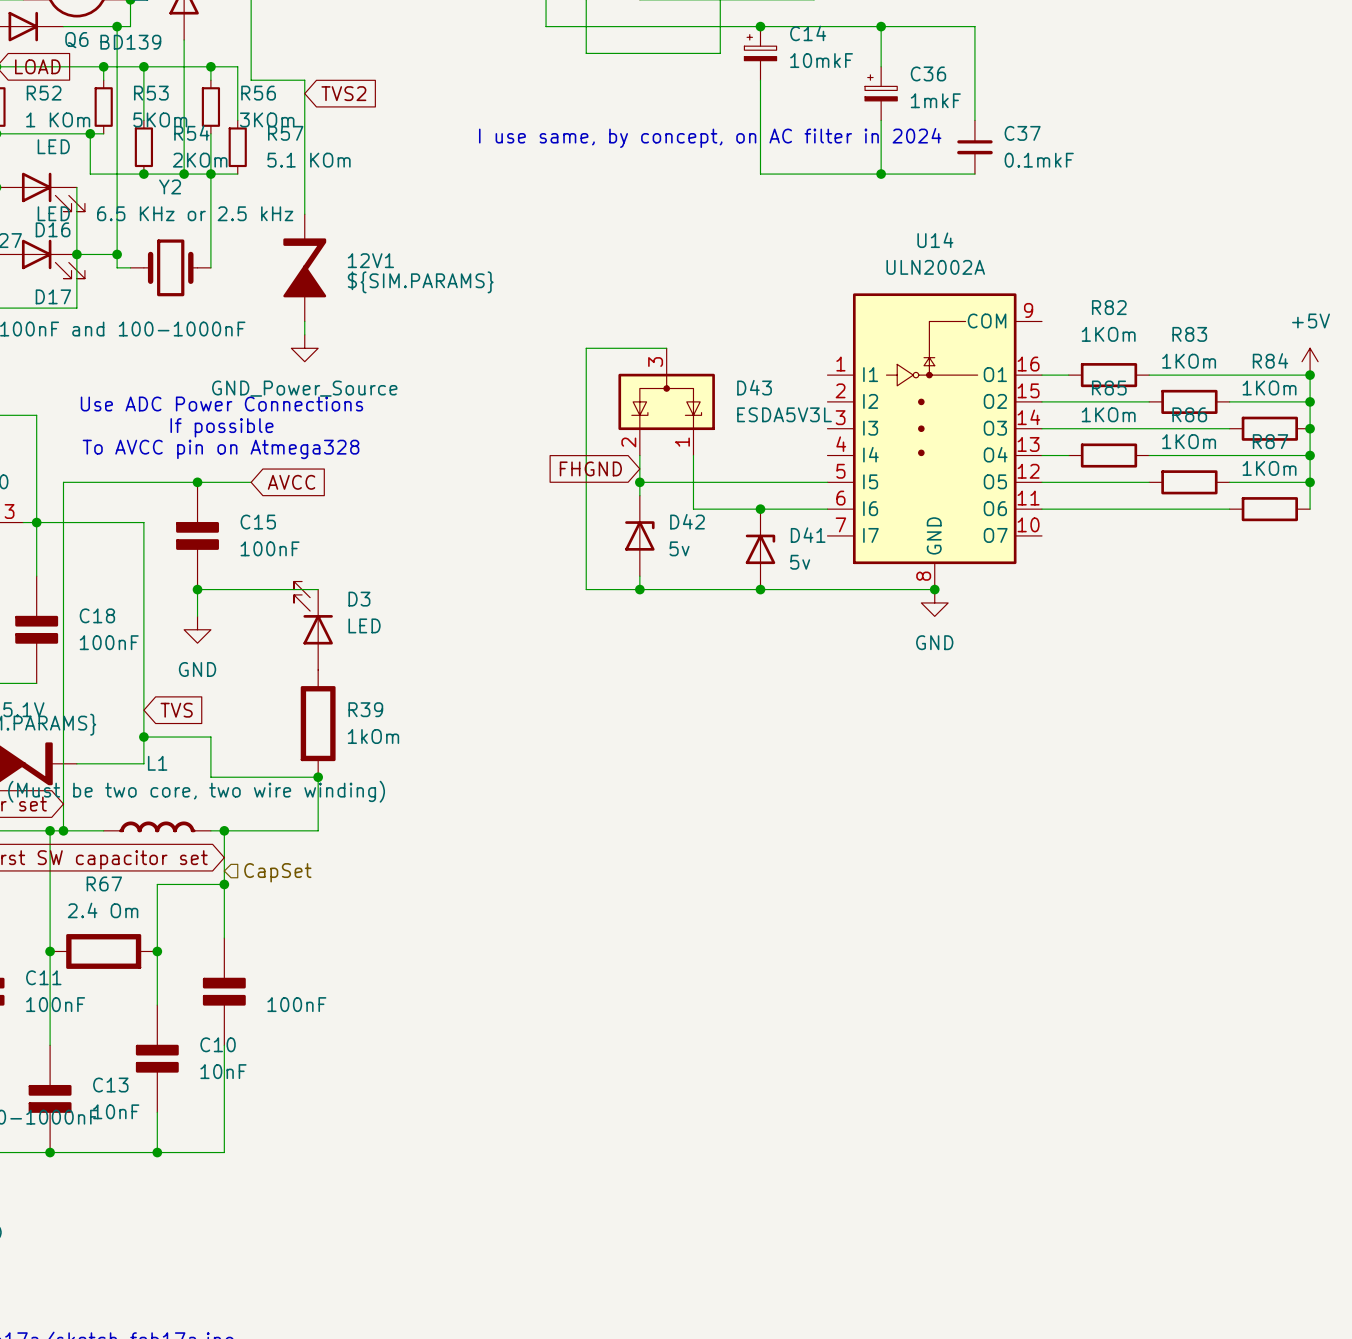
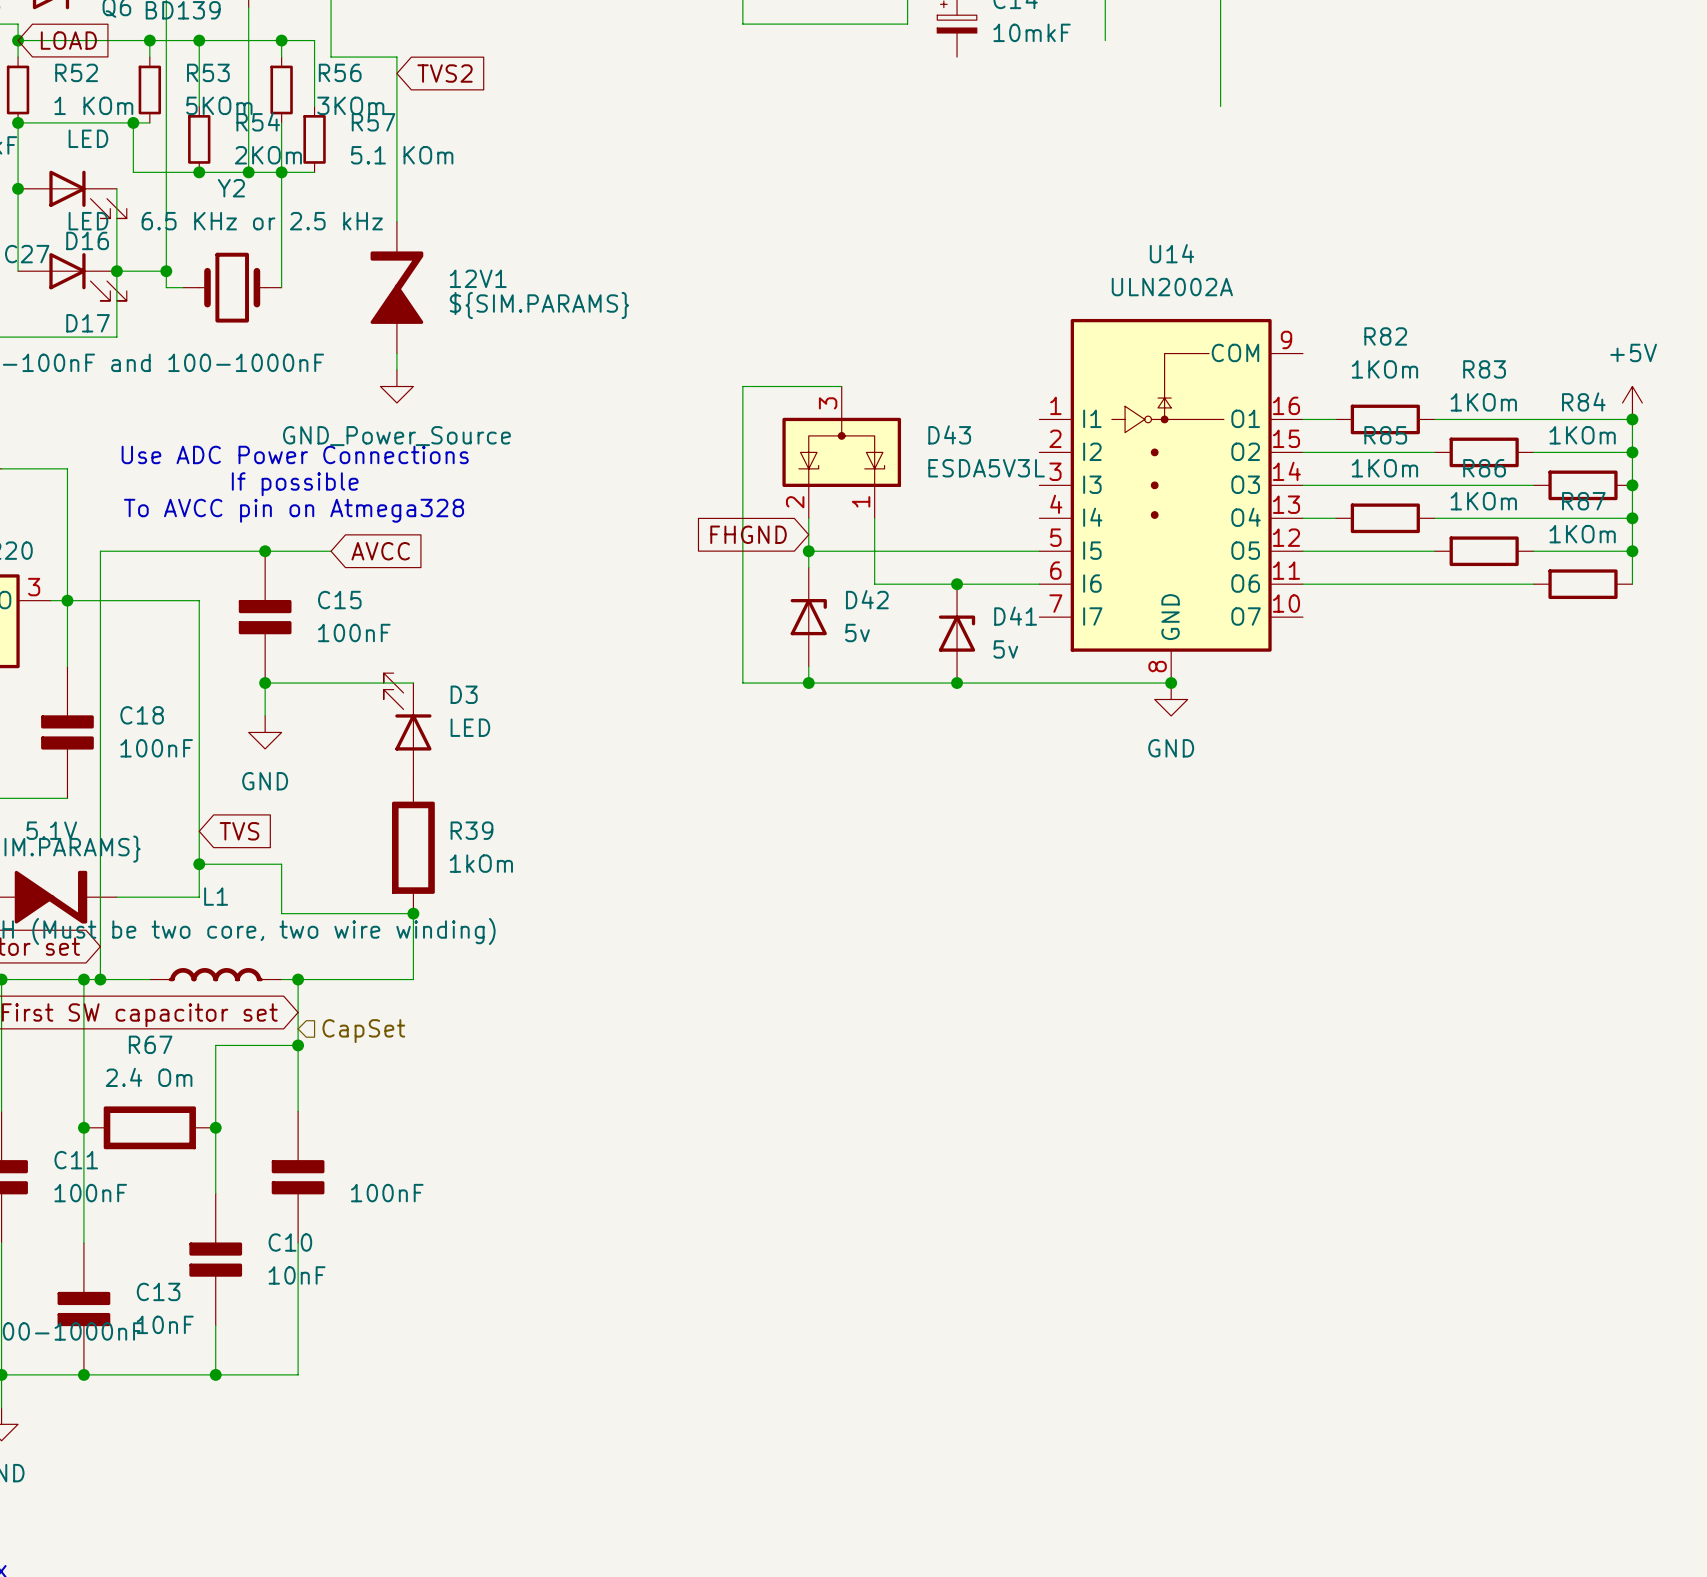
wire: (760, 80) (760, 174) (974, 174) -> none
C36: 1mkF (881, 93) -> none
wire: (881, 120) (881, 174) -> none
text: I use same, by concept, on AC filter in 2024 (710, 137) -> none
C37: 0.1mkF (974, 147) -> none
junction: (881, 174) -> none

